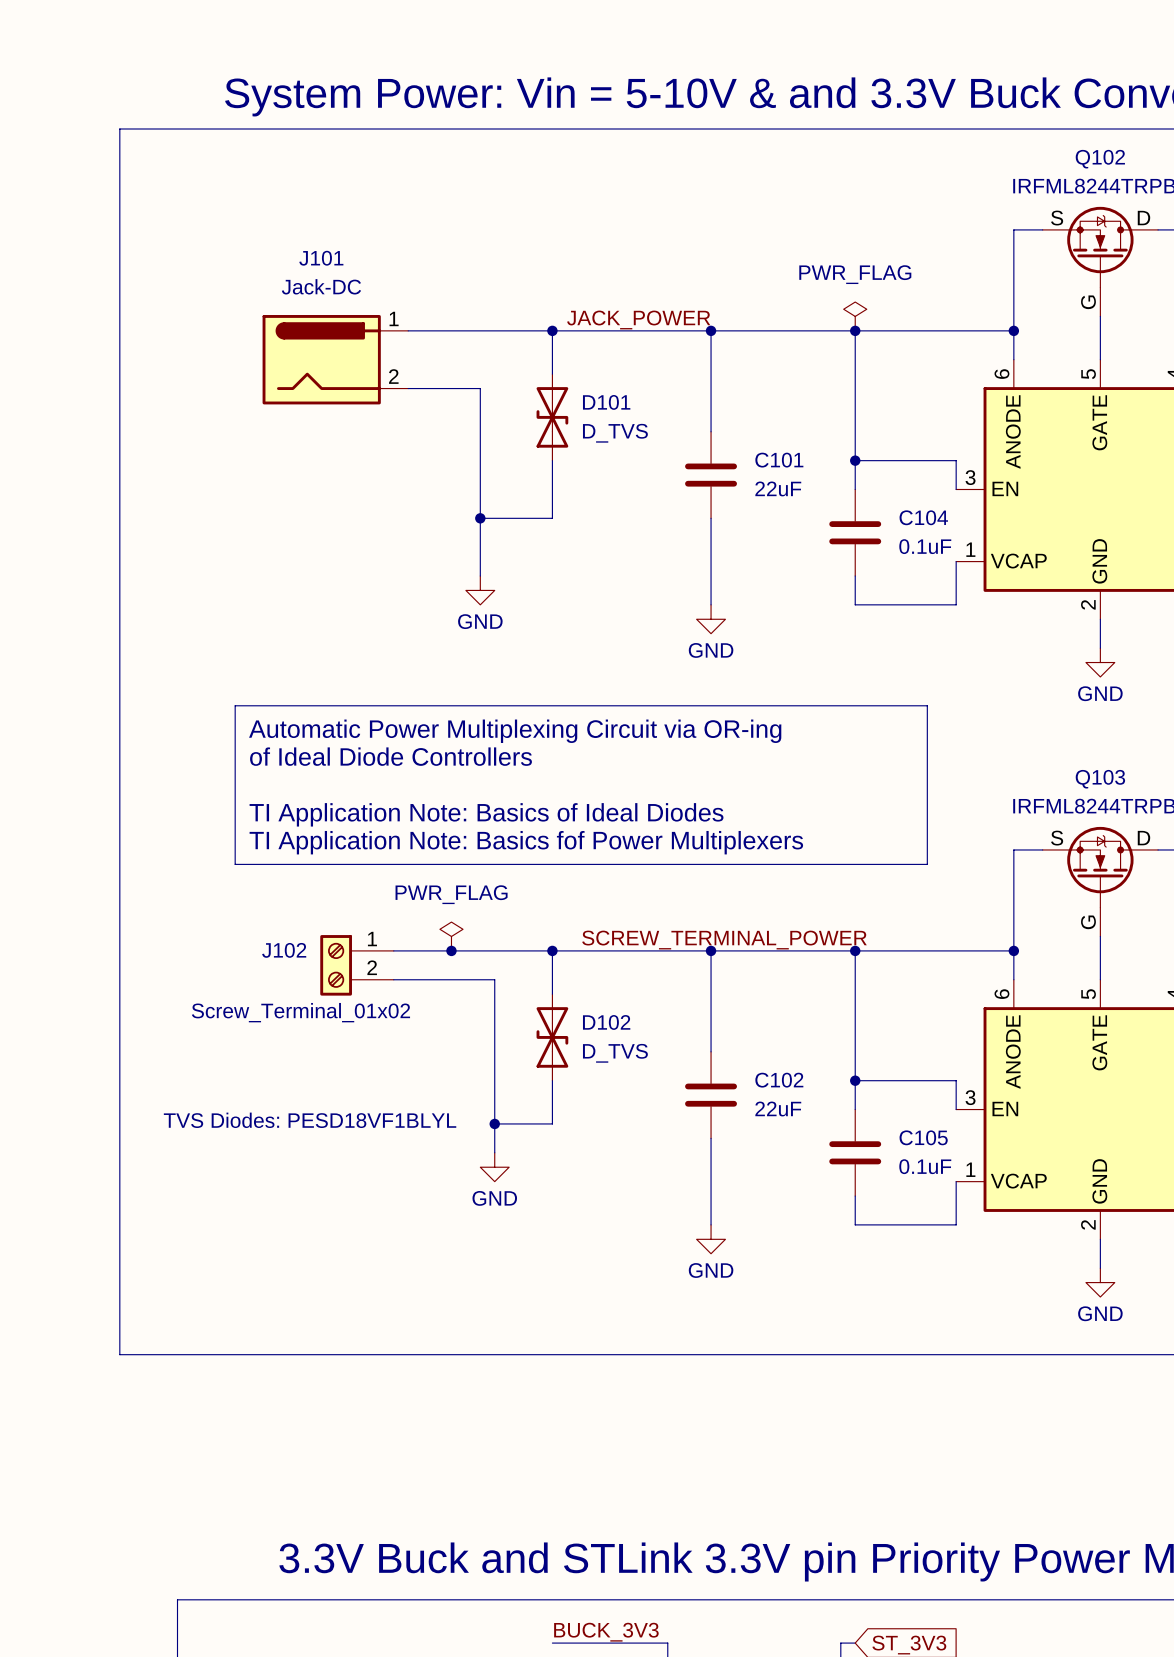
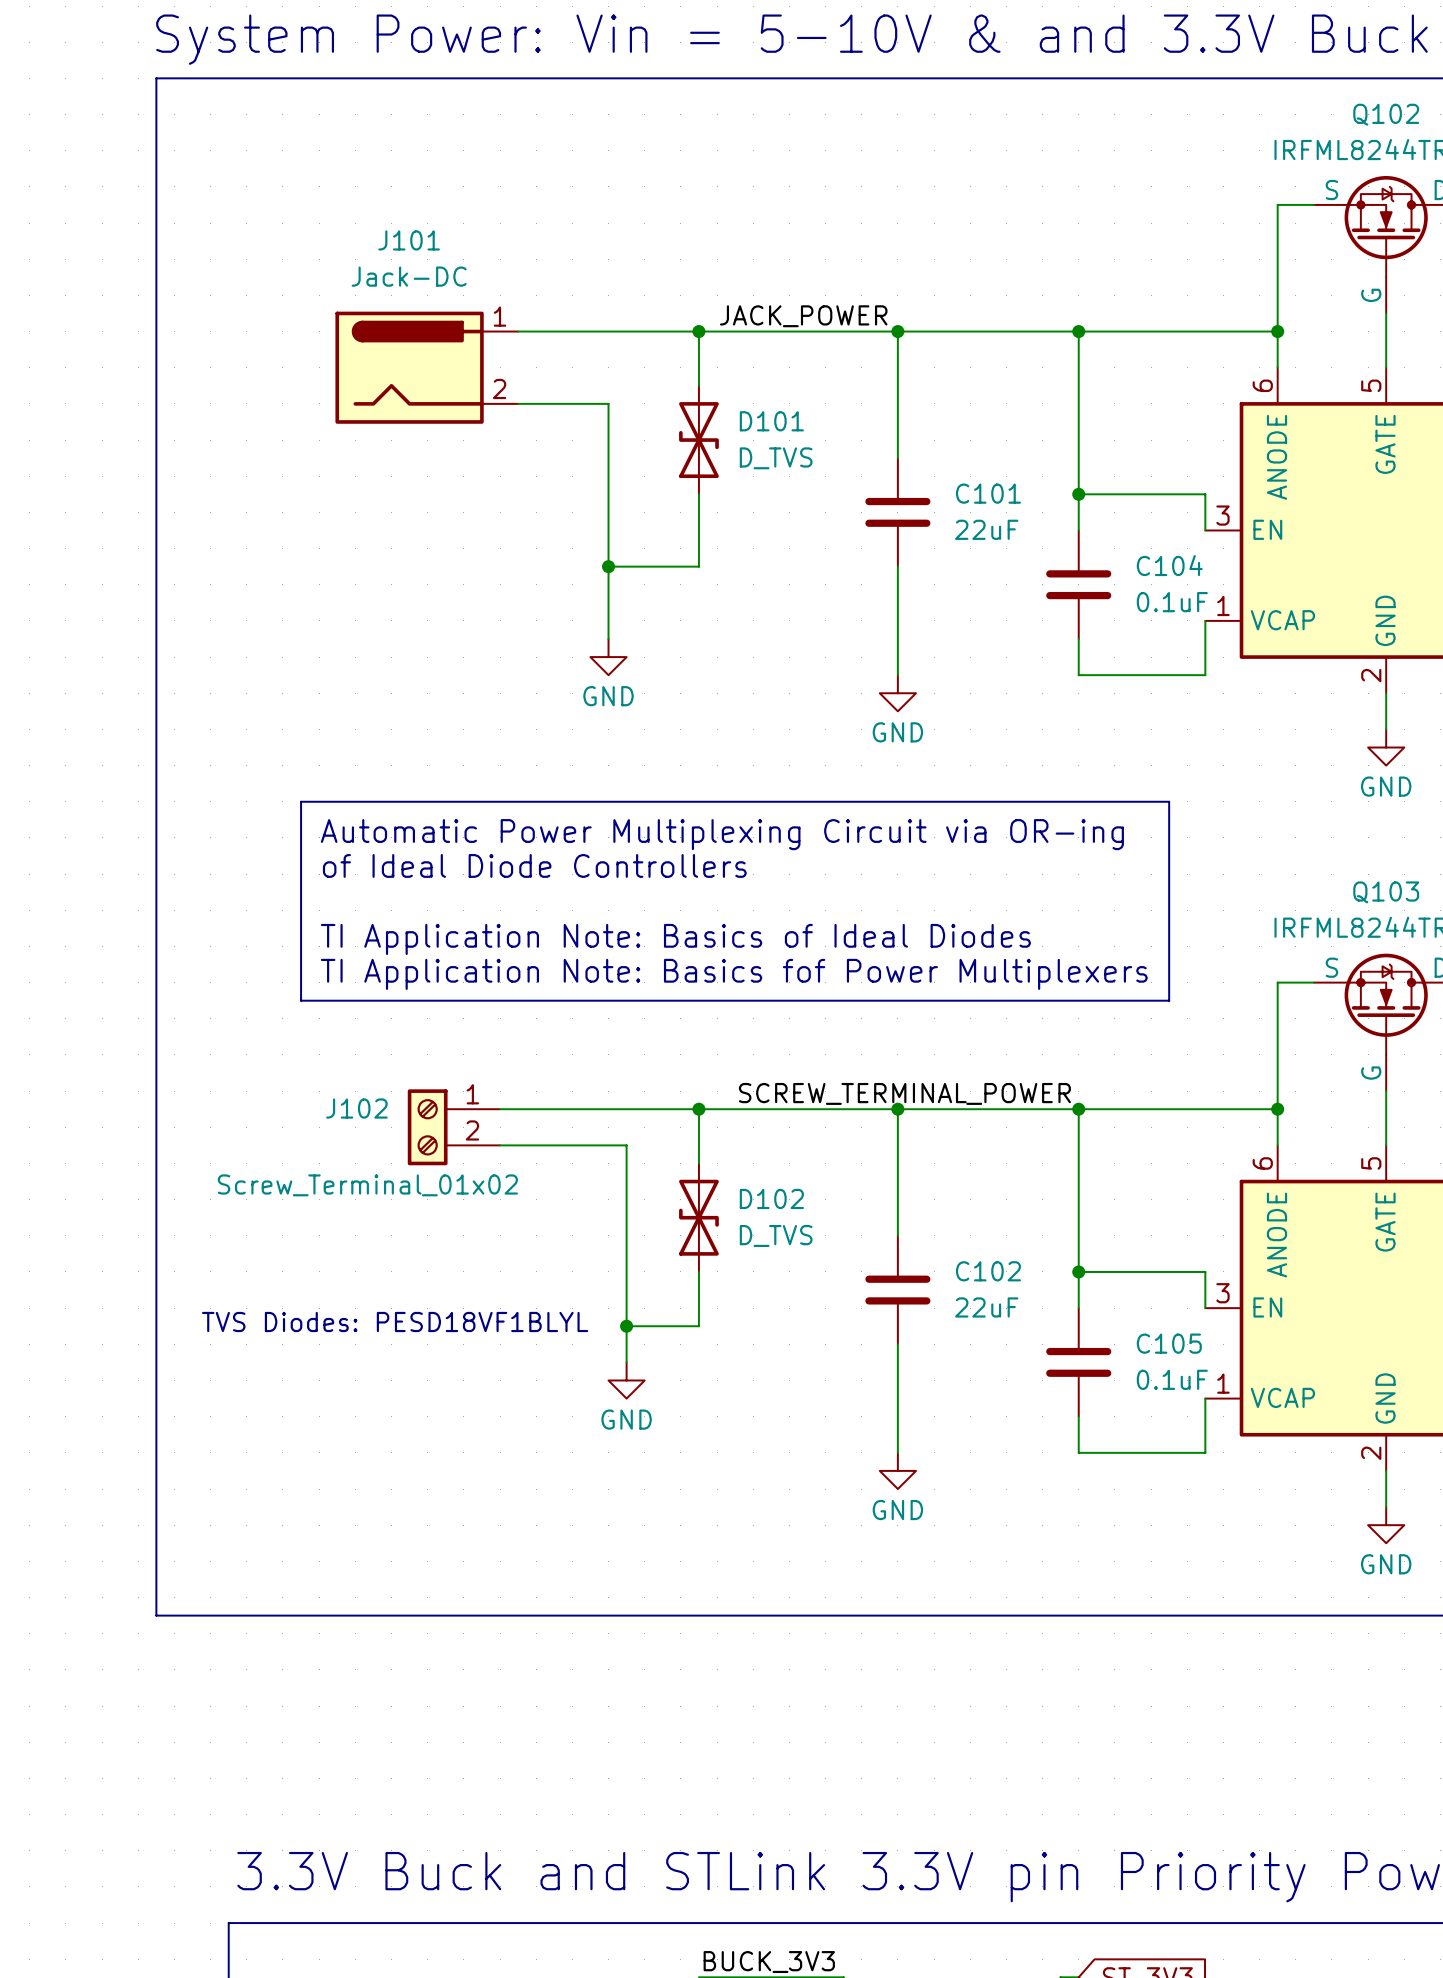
power symbol: PWR_FLAG (855, 316) -> none
power symbol: PWR_FLAG (451, 936) -> none
junction: (451, 950) -> none

